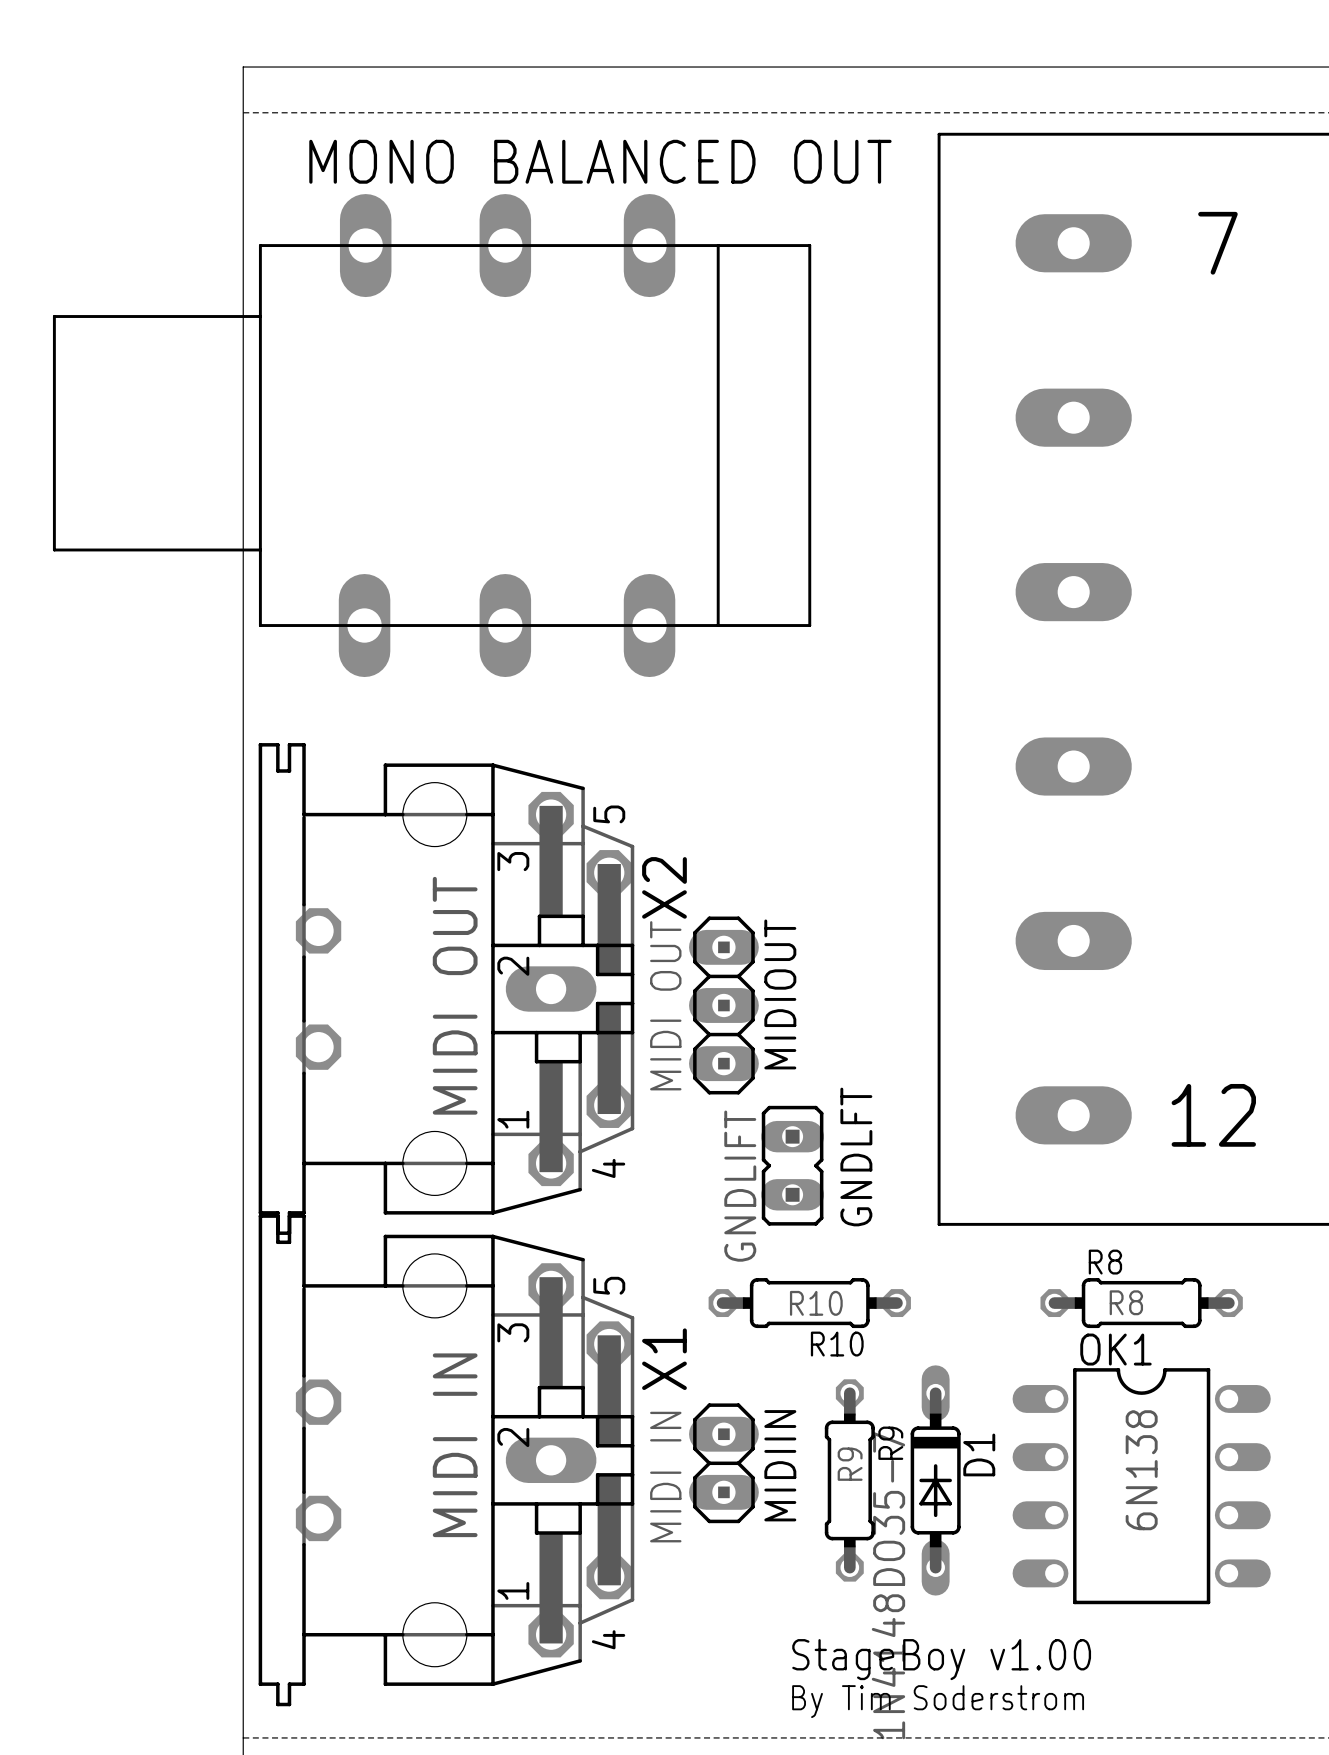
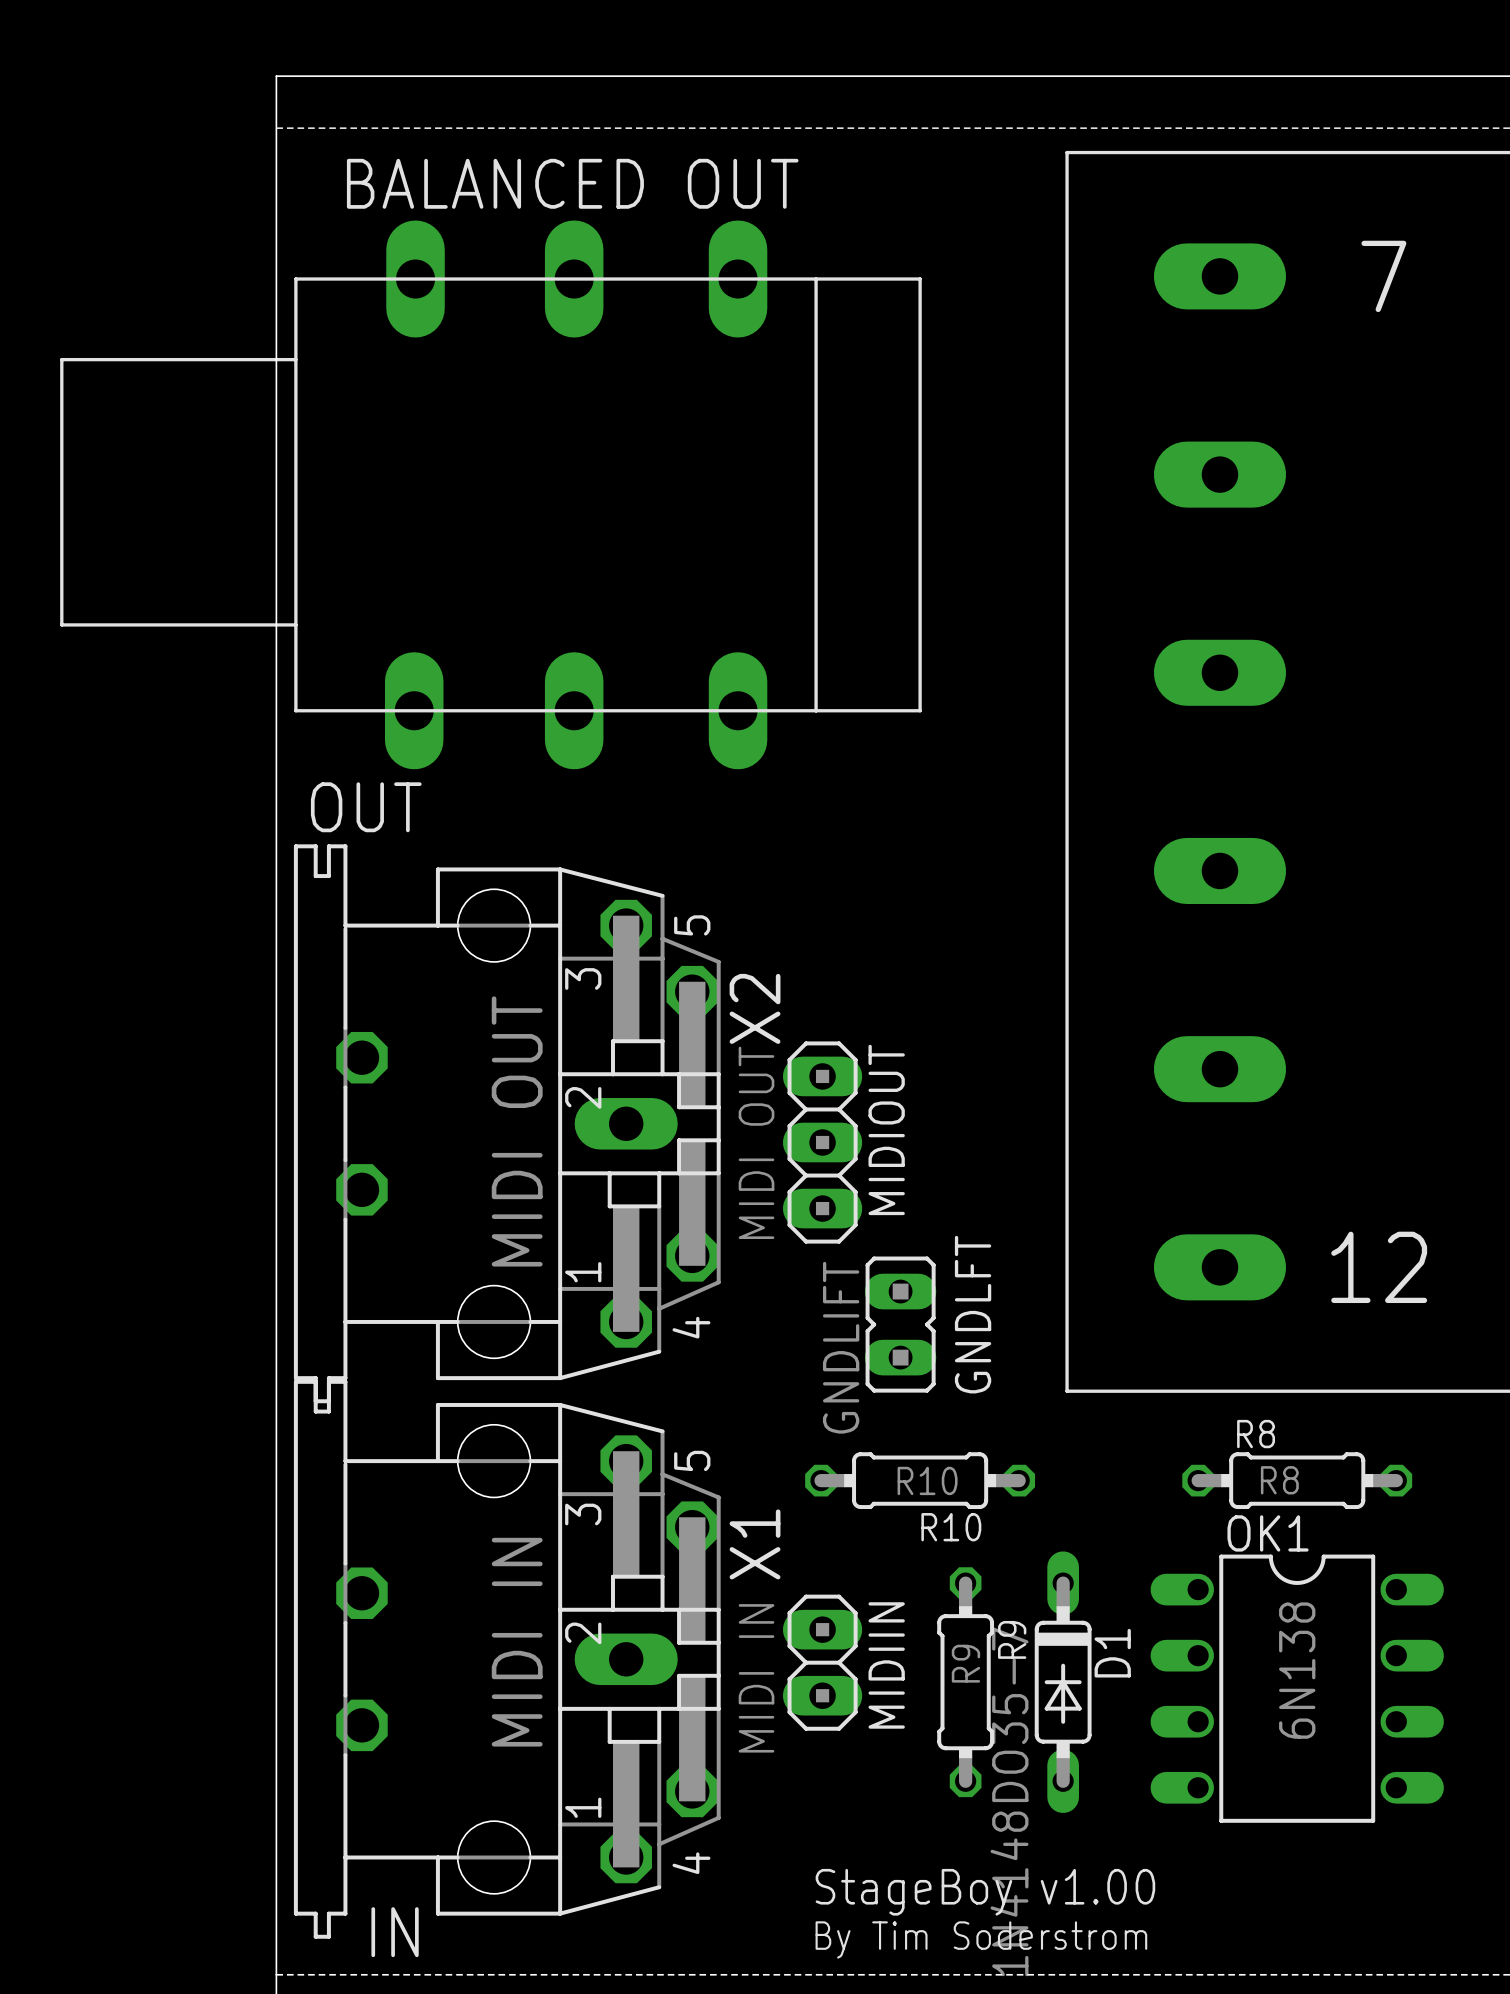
text: MONO BALANCED OUT (600, 161) -> BALANCED OUT (572, 183)
text: none -> OUT (366, 807)
text position: StageBoy v1.00 (941, 1659) -> StageBoy v1.00 (985, 1892)
text: none -> IN (395, 1932)
text position: By Tim Soderstrom (938, 1701) -> By Tim Soderstrom (981, 1939)

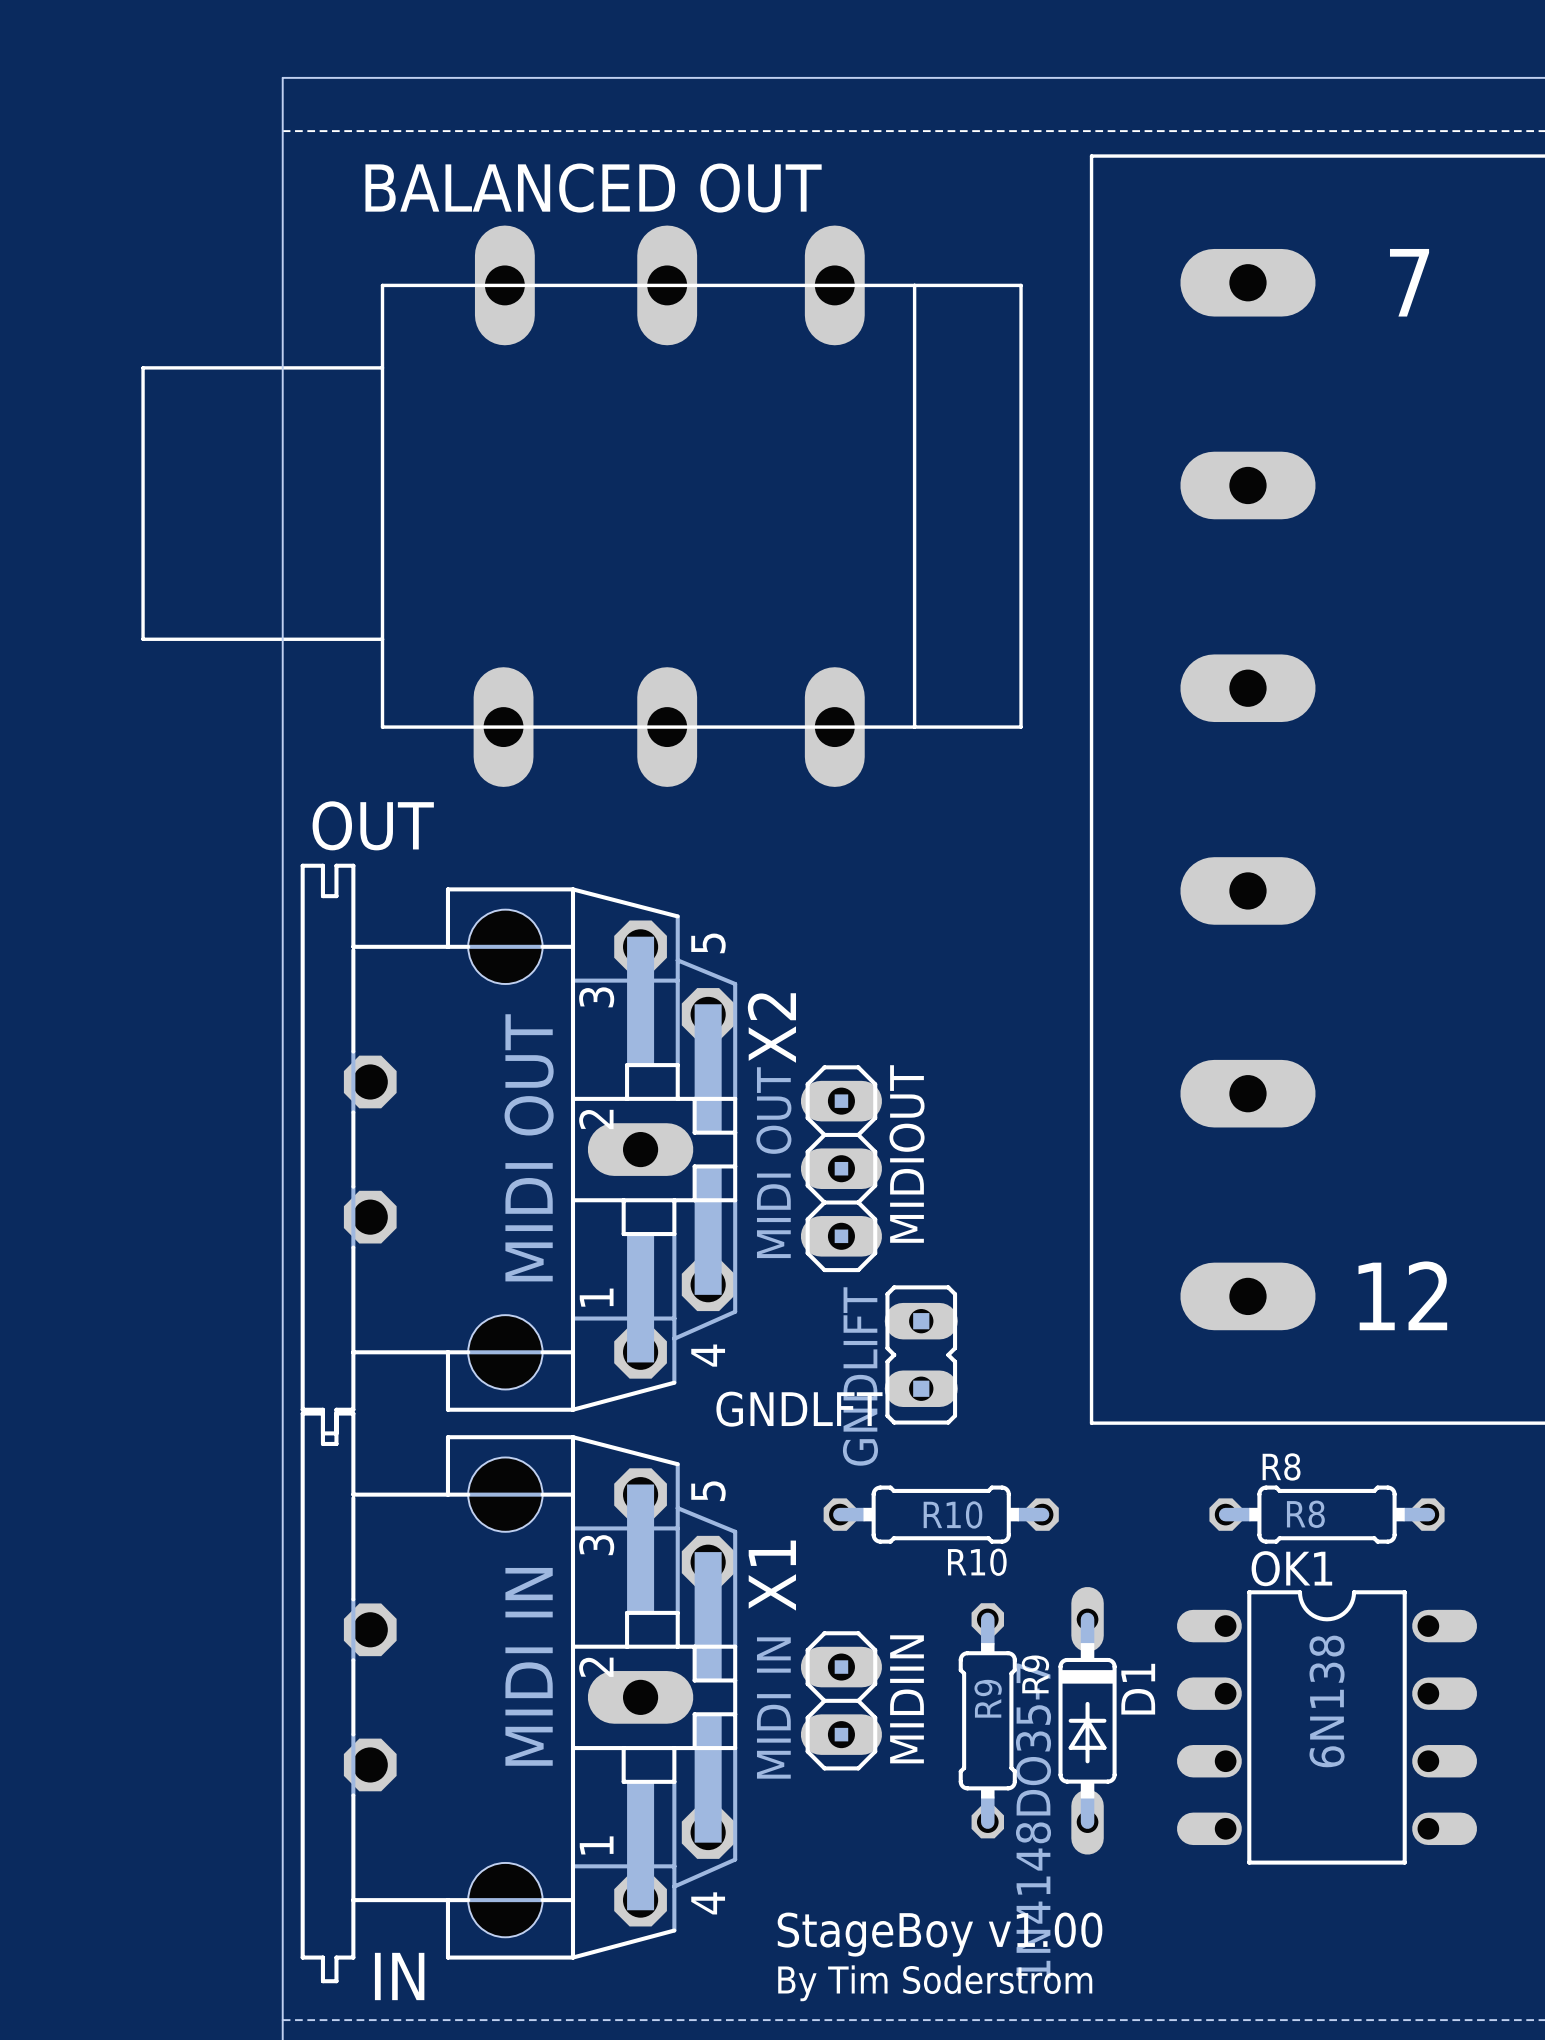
part position: (490, 494) -> (582, 506)
GNDLFT name rotation: 0° (973, 1314) -> 90° clockwise (799, 1409)
GNDLFT name position: GNDLFT (973, 1314) -> GNDLFT (799, 1409)
text position: StageBoy v1.00 (985, 1892) -> StageBoy v1.00 (940, 1934)
text position: By Tim Soderstrom (981, 1939) -> By Tim Soderstrom (935, 1983)

